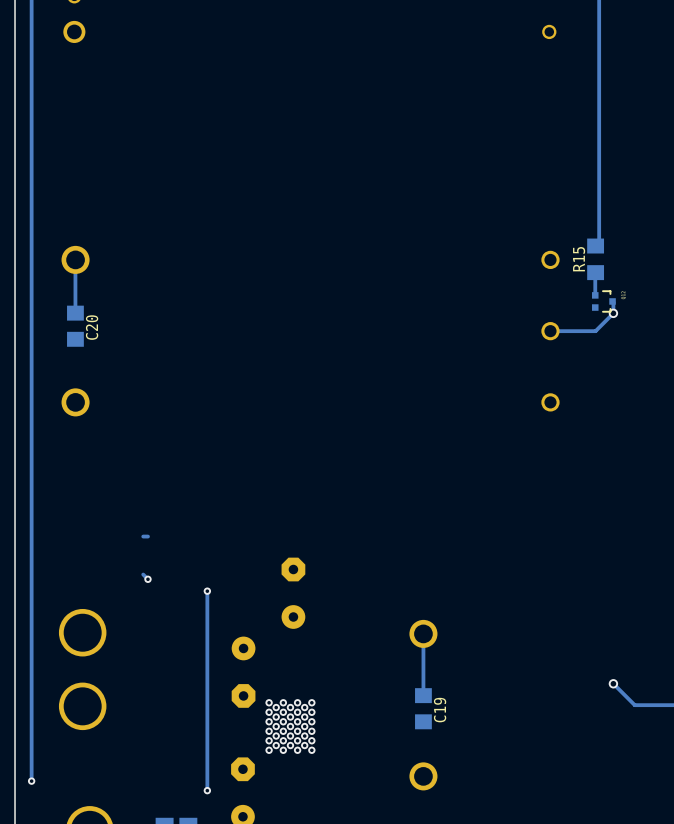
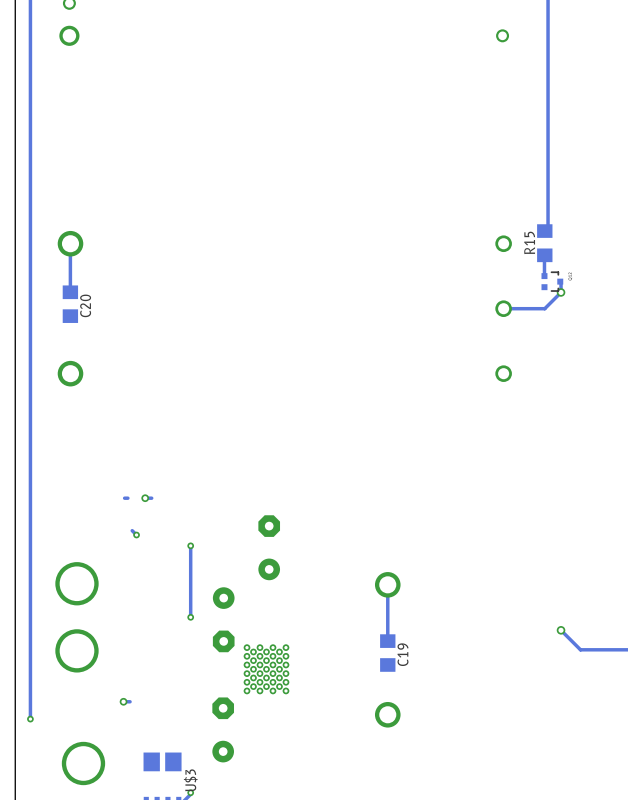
track: (147, 536) (143, 536) -> none
track: none -> (127, 498) (124, 498)
via: none -> (145, 498)
track: none -> (151, 498) (145, 498)
track: (207, 669) (207, 790) -> none
via: none -> (190, 617)
via: none -> (123, 701)
track: none -> (130, 701) (123, 701)
via: (207, 790) -> none

